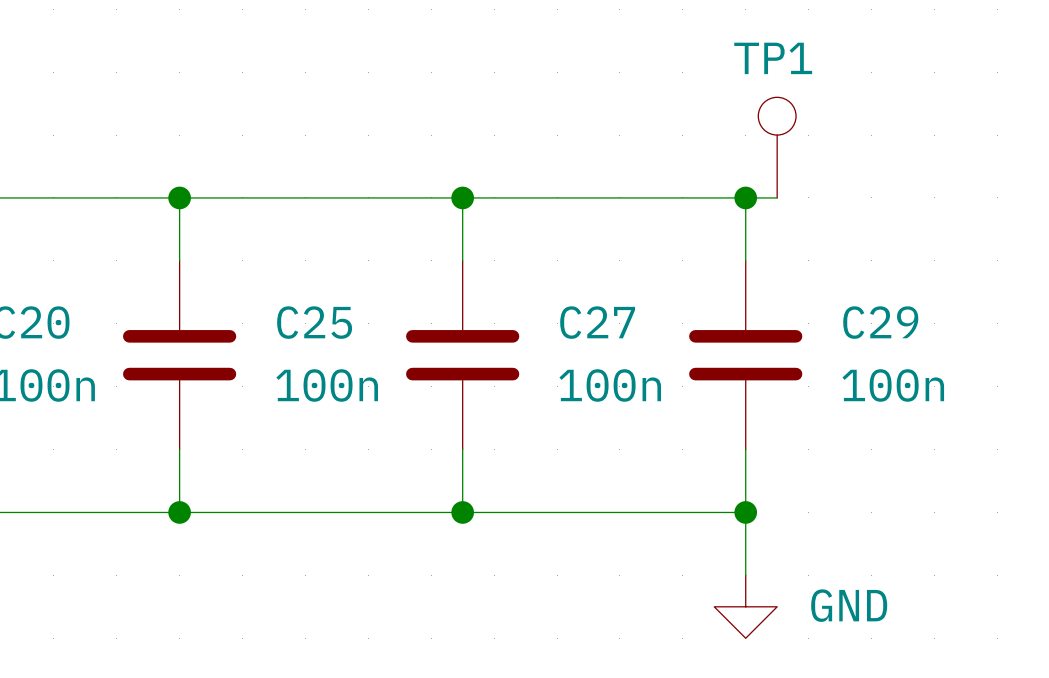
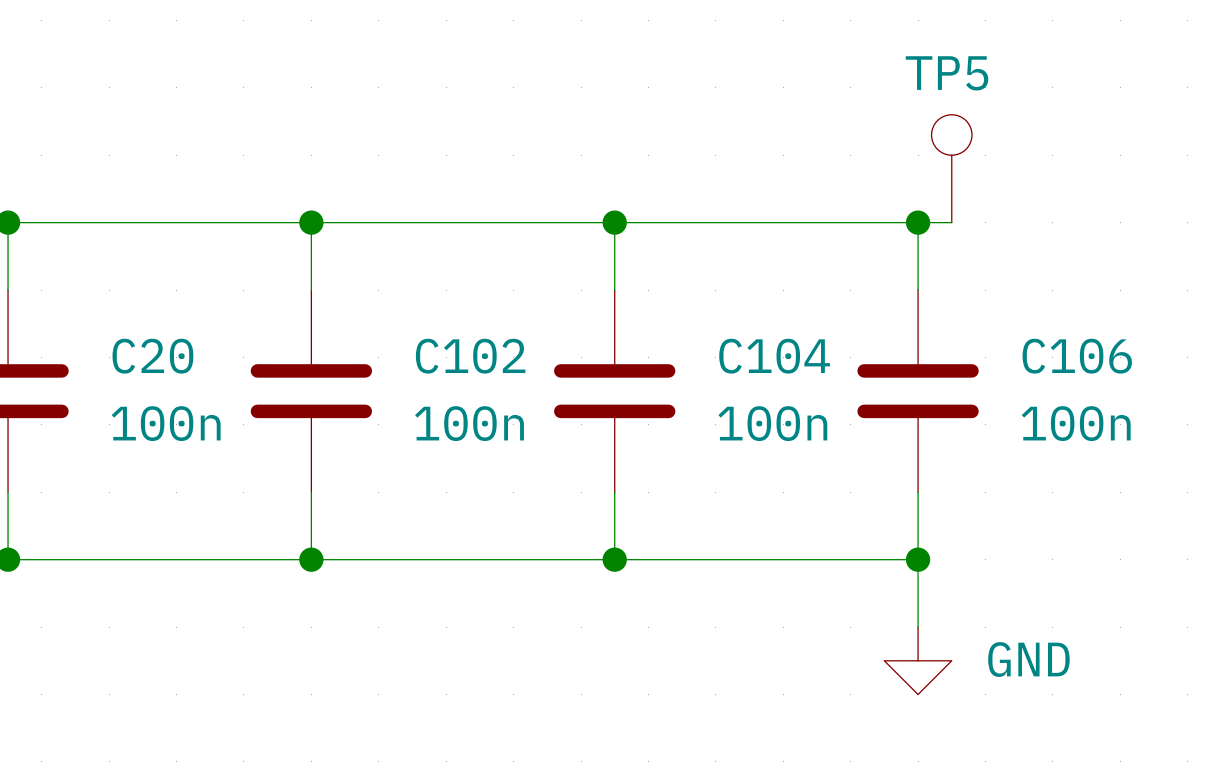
TP1 name: TP1 (773, 58) -> TP5 (947, 73)
C25 name: C25 (314, 322) -> C102 (470, 356)
C27 name: C27 (597, 322) -> C104 (774, 356)
C29 name: C29 (880, 322) -> C106 (1077, 356)

